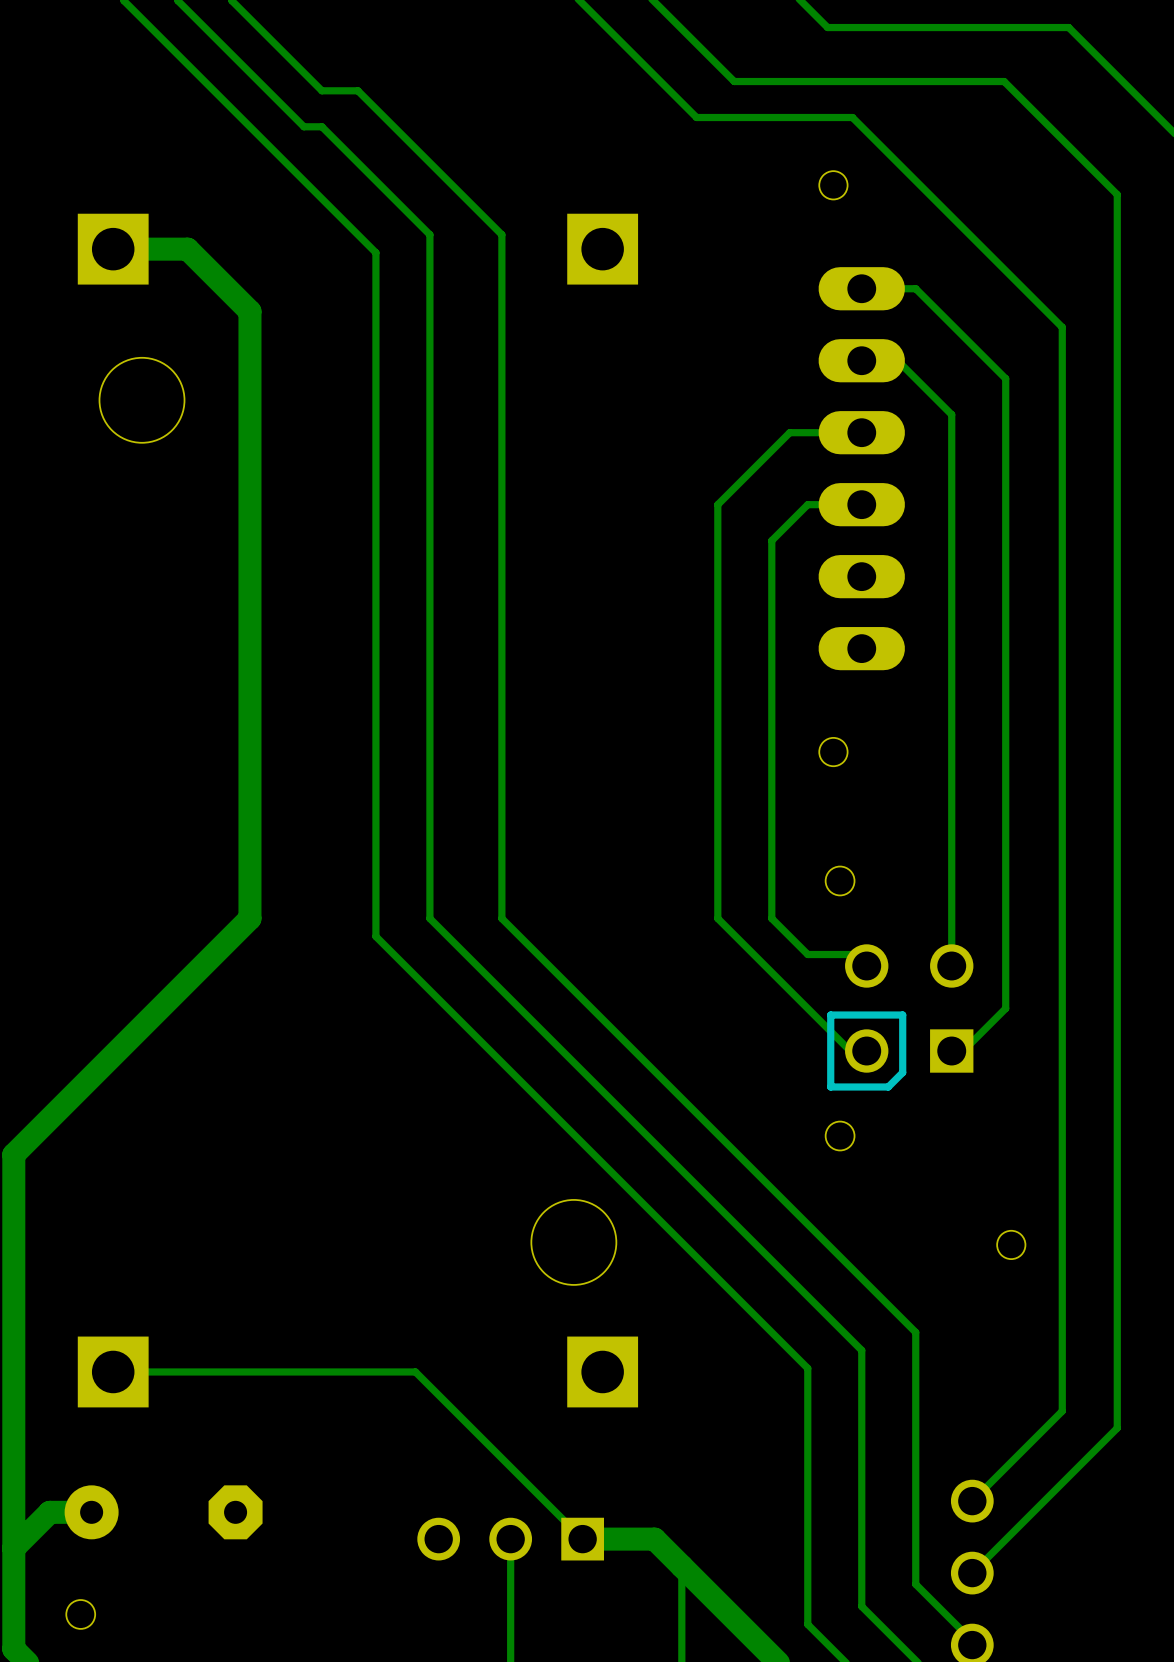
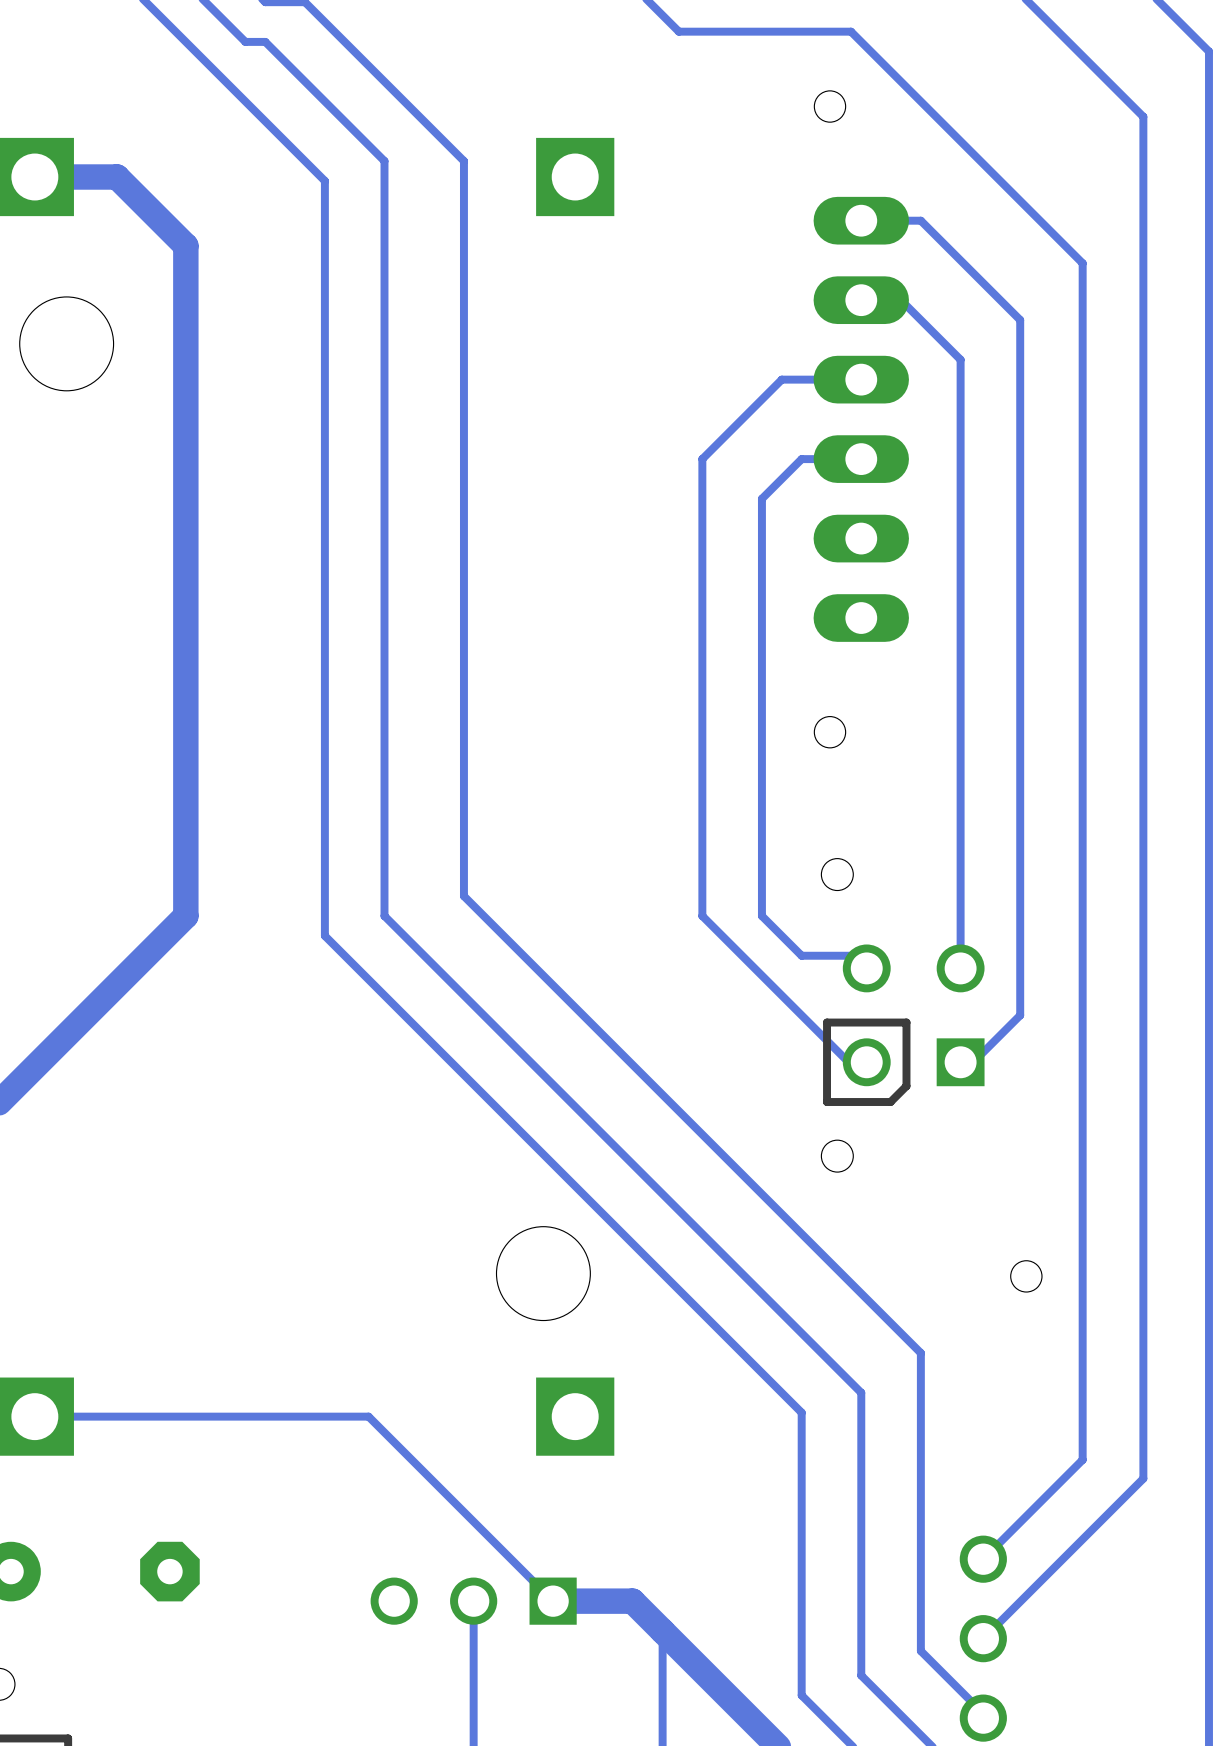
bottom track: (501, 900) (501, 918) (915, 1332) -> (463, 896) (920, 1353) (920, 1372)

